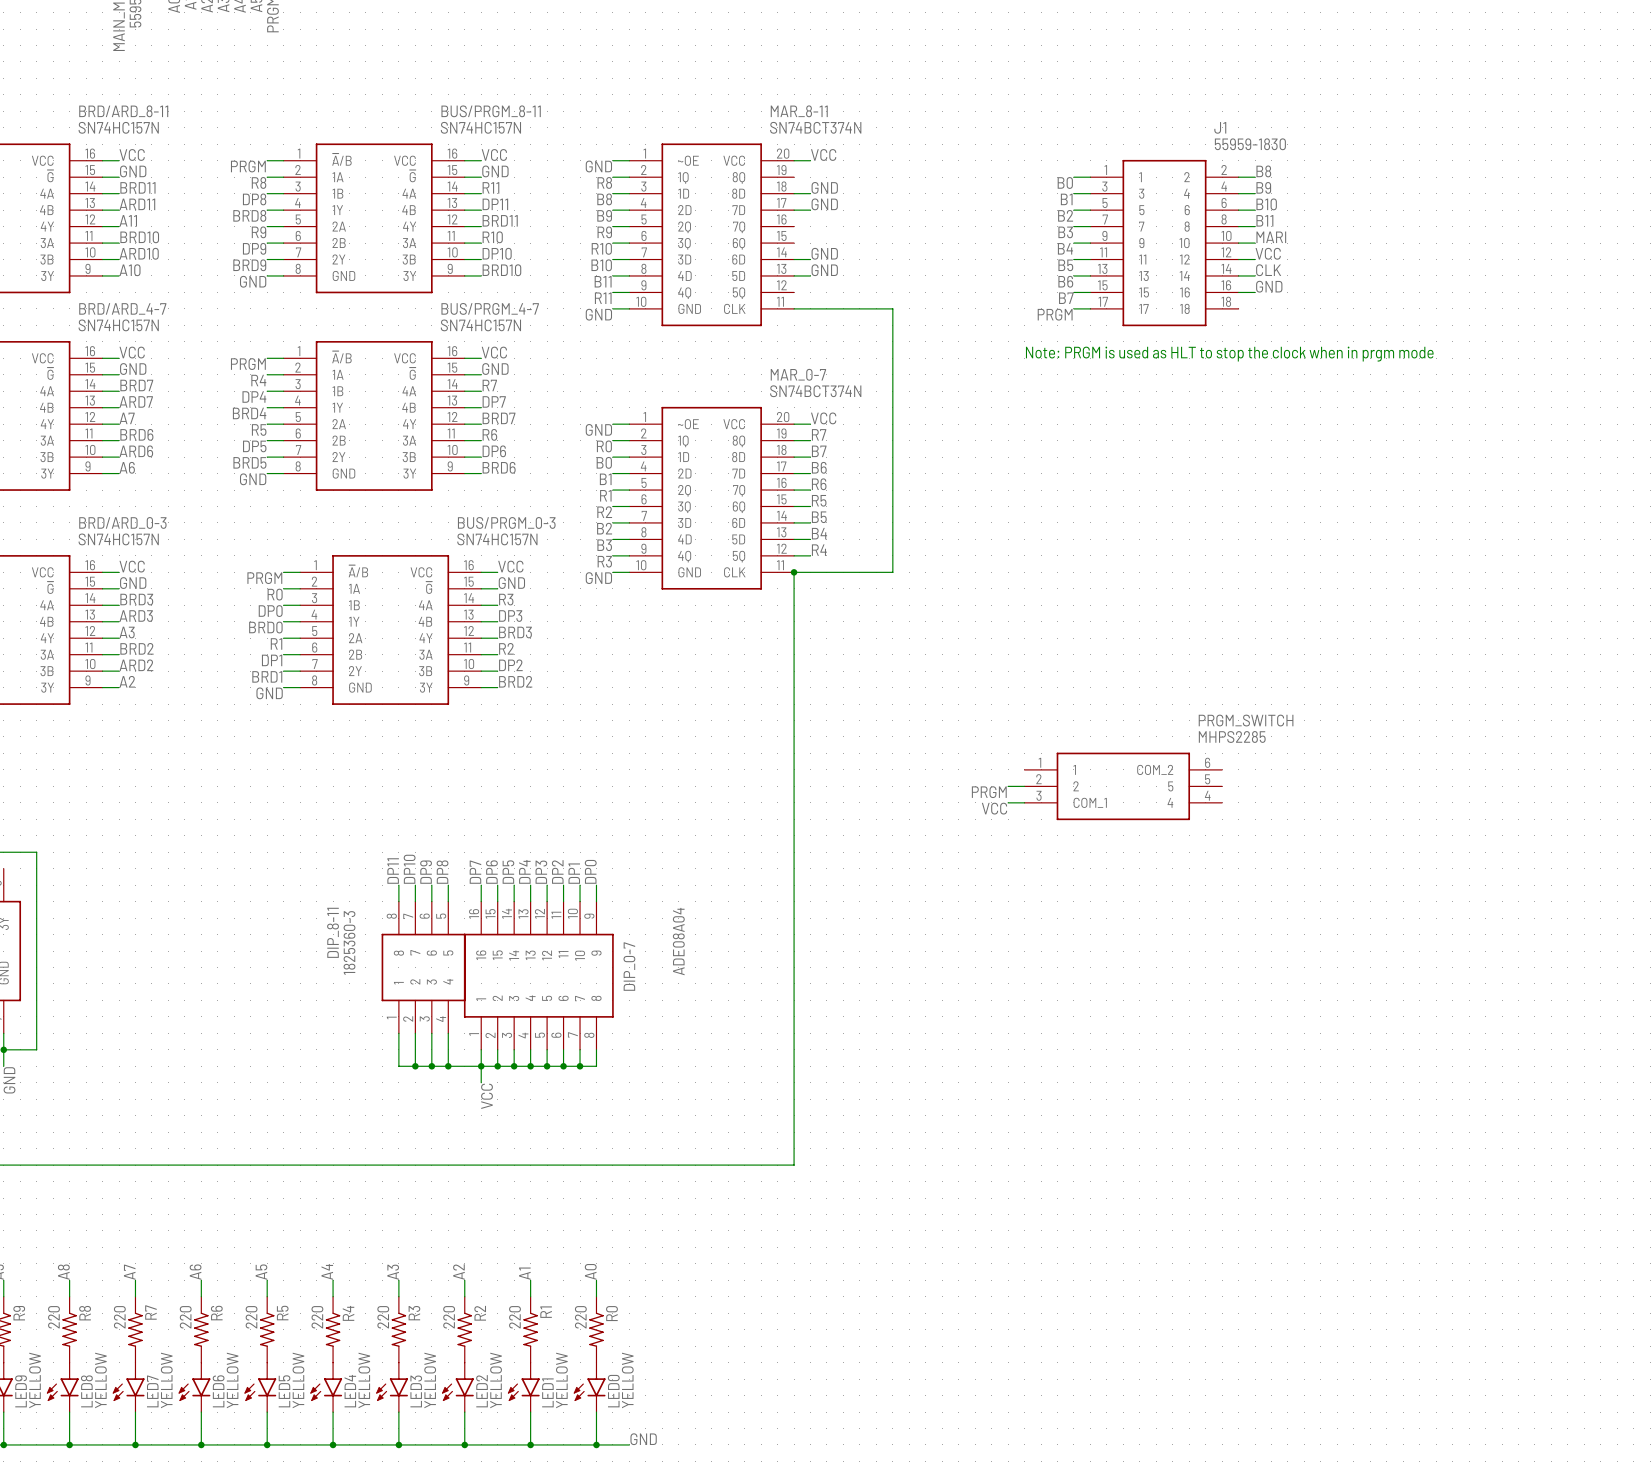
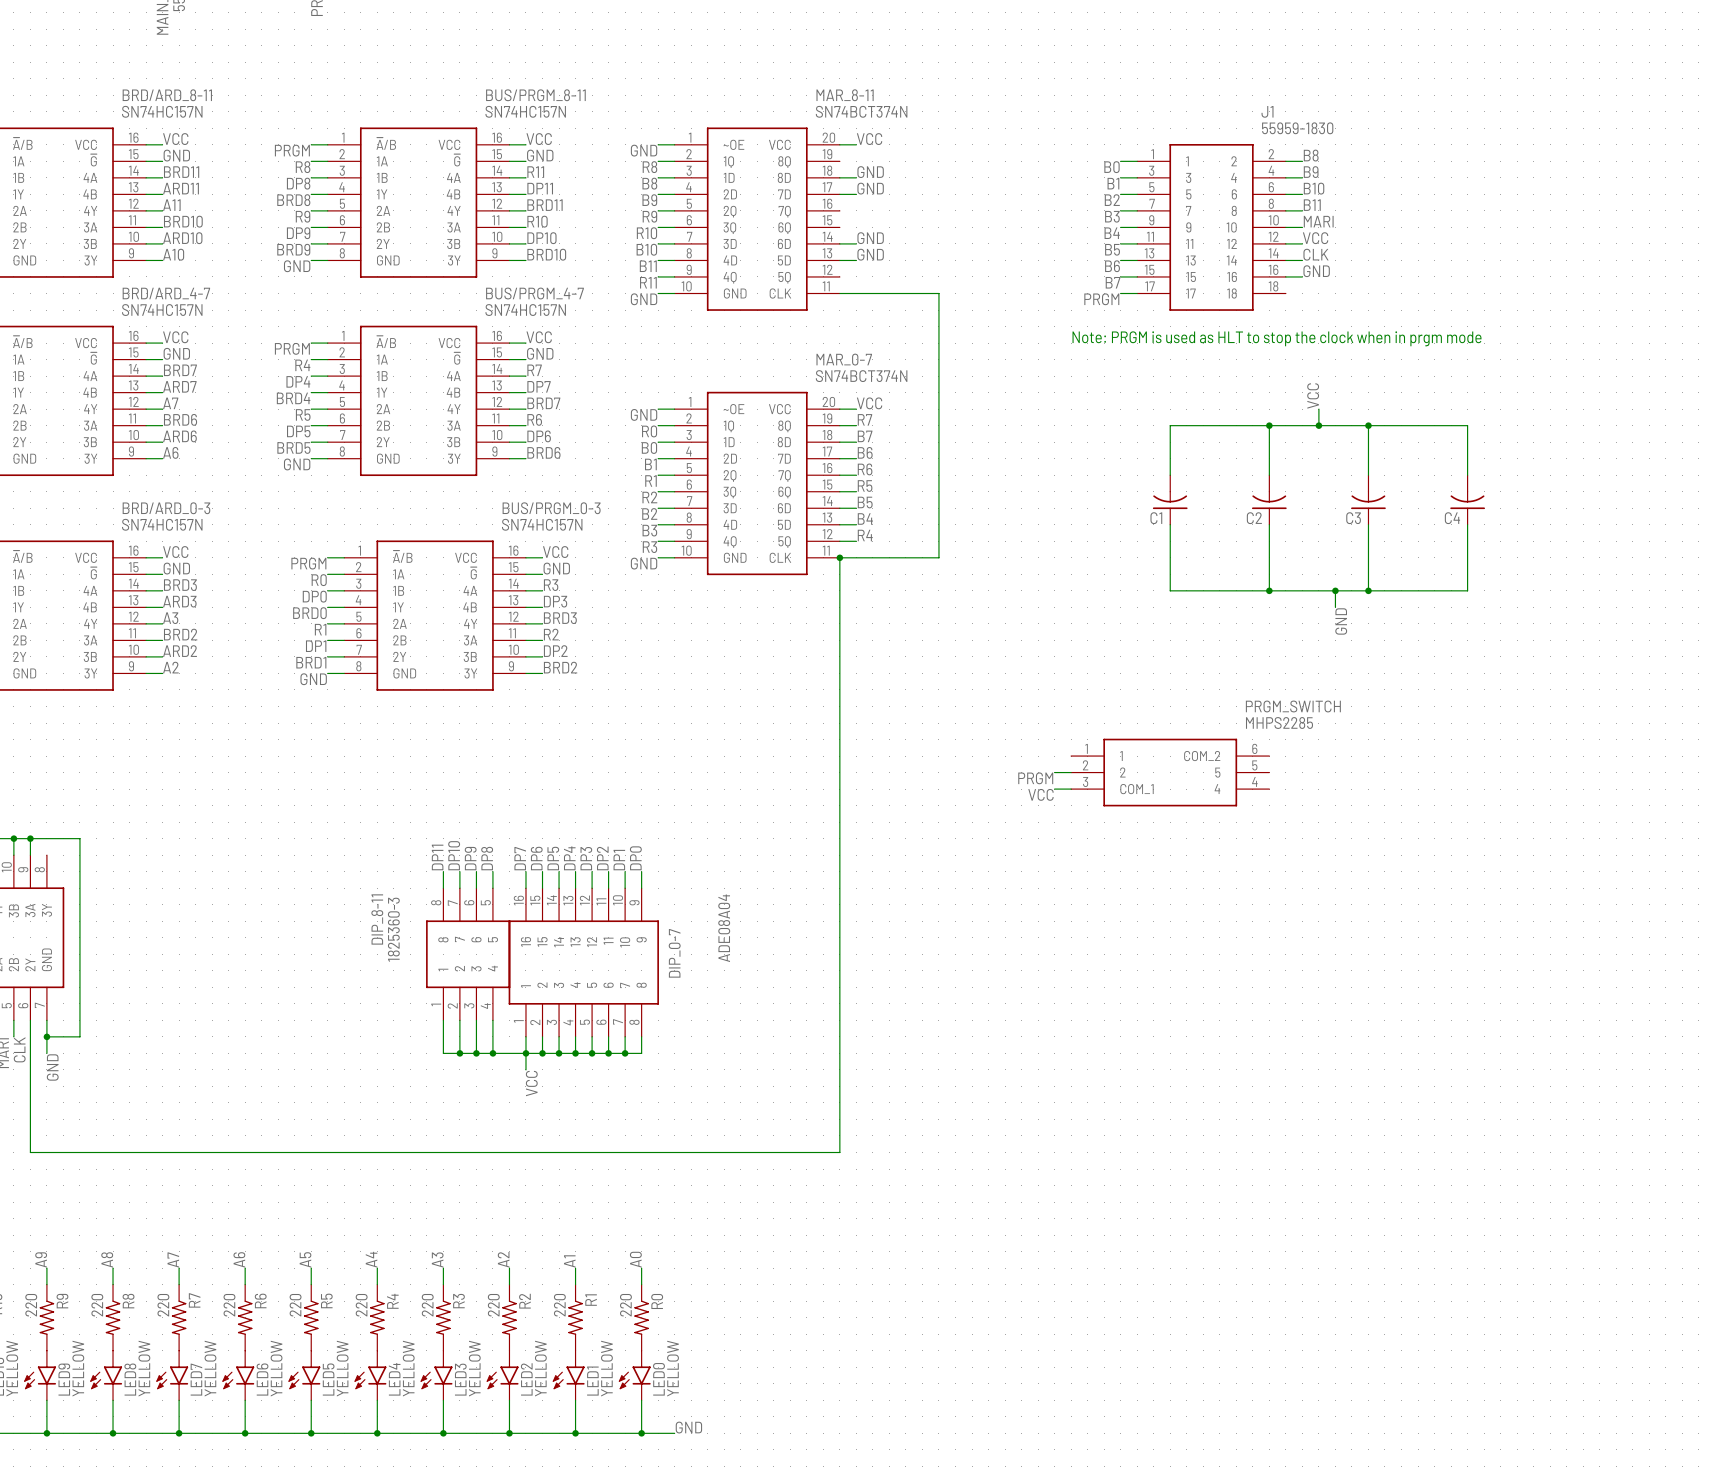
label: none -> VCC (1313, 395)
wire: none -> (1318, 409) (1318, 425)
wire: none -> (1269, 425) (1269, 475)
junction: none -> (1269, 425)
junction: none -> (1318, 425)
wire: none -> (1368, 425) (1368, 475)
junction: none -> (1368, 425)
wire: none -> (1170, 475) (1170, 425) (1467, 425) (1467, 475)
C1: none -> (1170, 499)
C2: none -> (1269, 499)
C3: none -> (1368, 499)
C4: none -> (1467, 499)
wire: none -> (1170, 524) (1170, 590) (1467, 590) (1467, 524)
wire: none -> (1269, 524) (1269, 590)
wire: none -> (1368, 524) (1368, 590)
junction: none -> (1269, 590)
wire: none -> (1335, 590) (1335, 607)
junction: none -> (1335, 590)
junction: none -> (1368, 590)
label: none -> GND (1341, 621)

